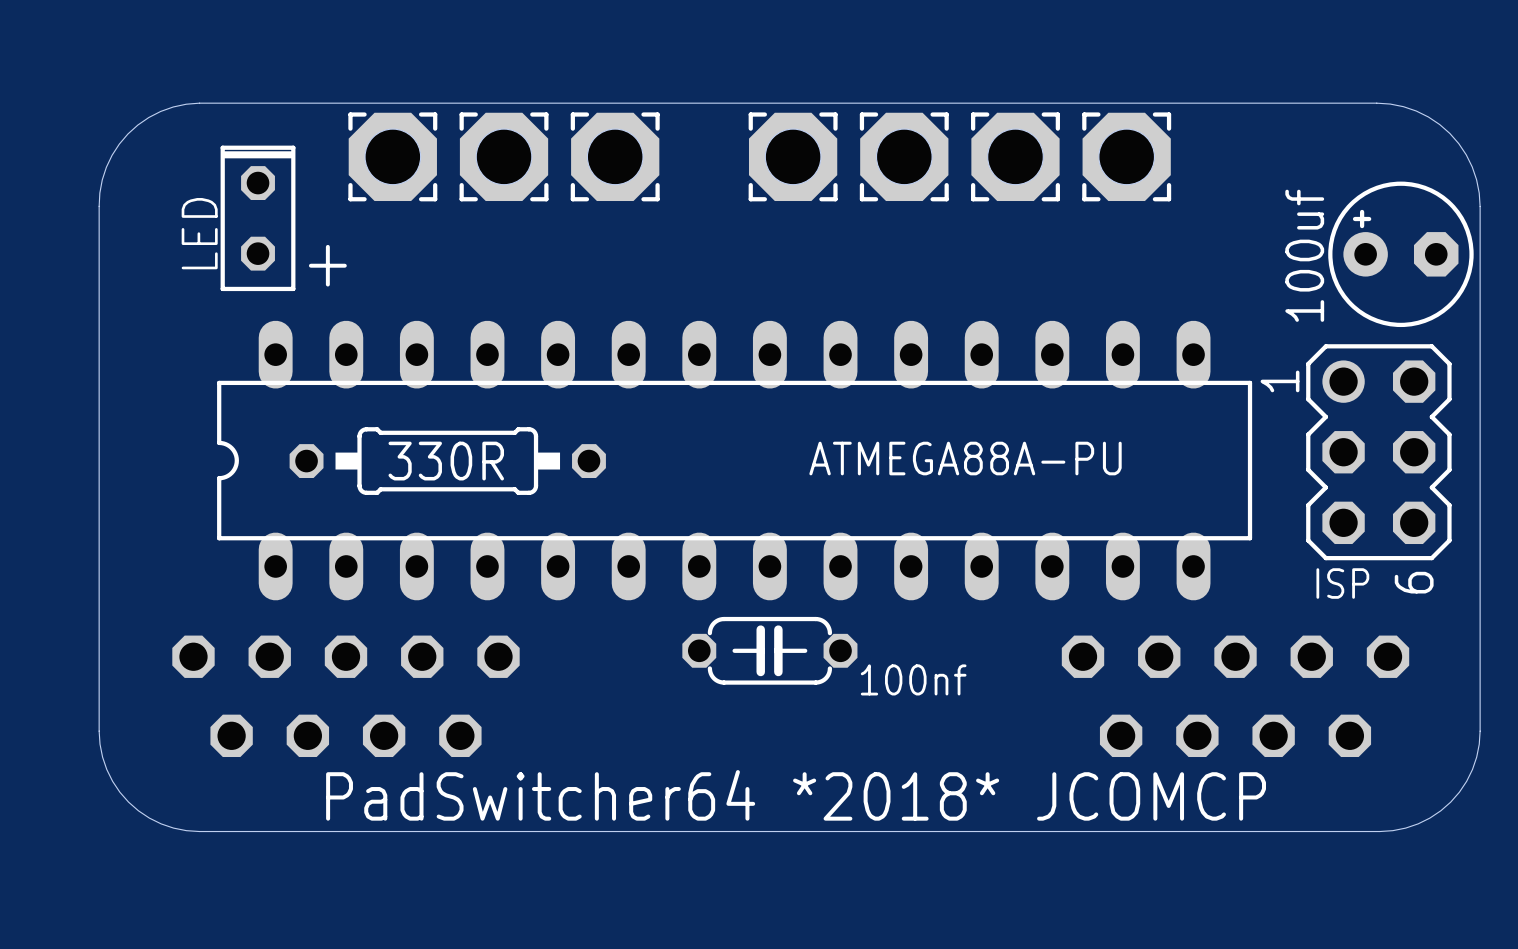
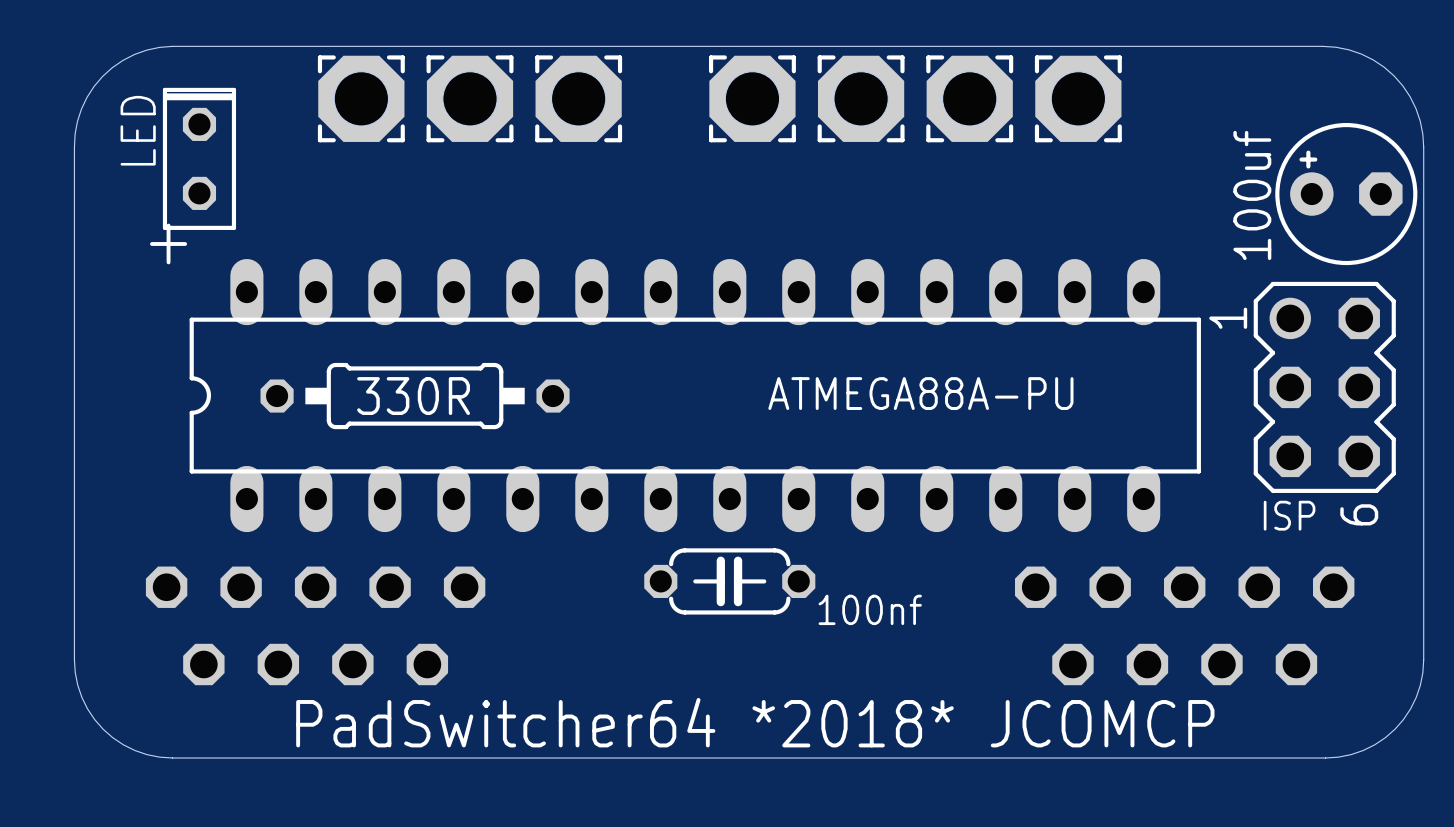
part position: (258, 218) -> (199, 158)
text position: LED (199, 233) -> LED (138, 130)
text position: + (327, 265) -> + (168, 243)

